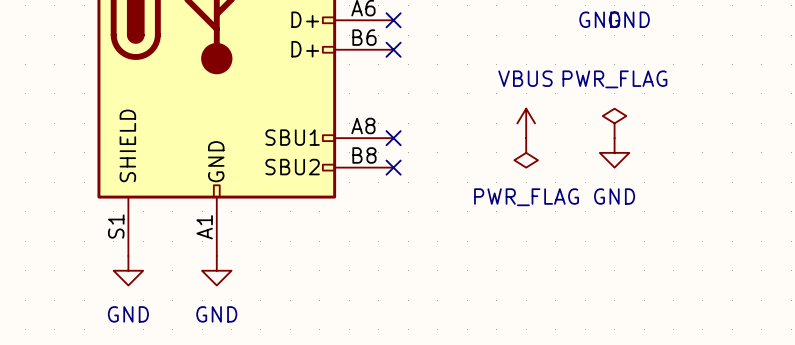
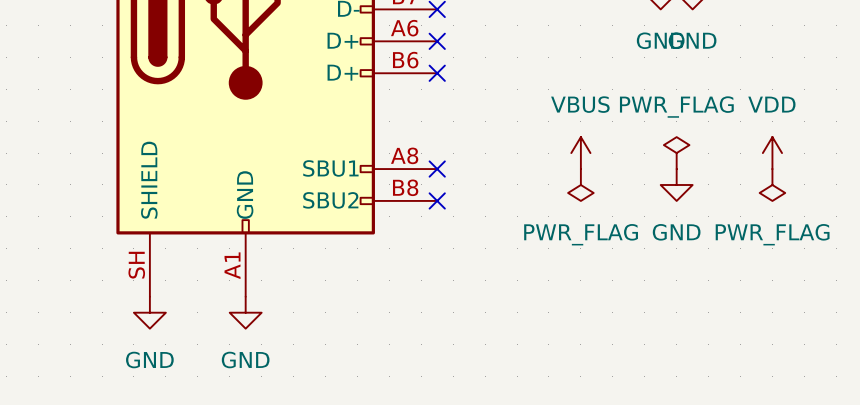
power symbol: none -> VDD (772, 153)
power symbol: none -> PWR_FLAG (772, 184)
part pin number: S1 (116, 226) -> SH (136, 265)

